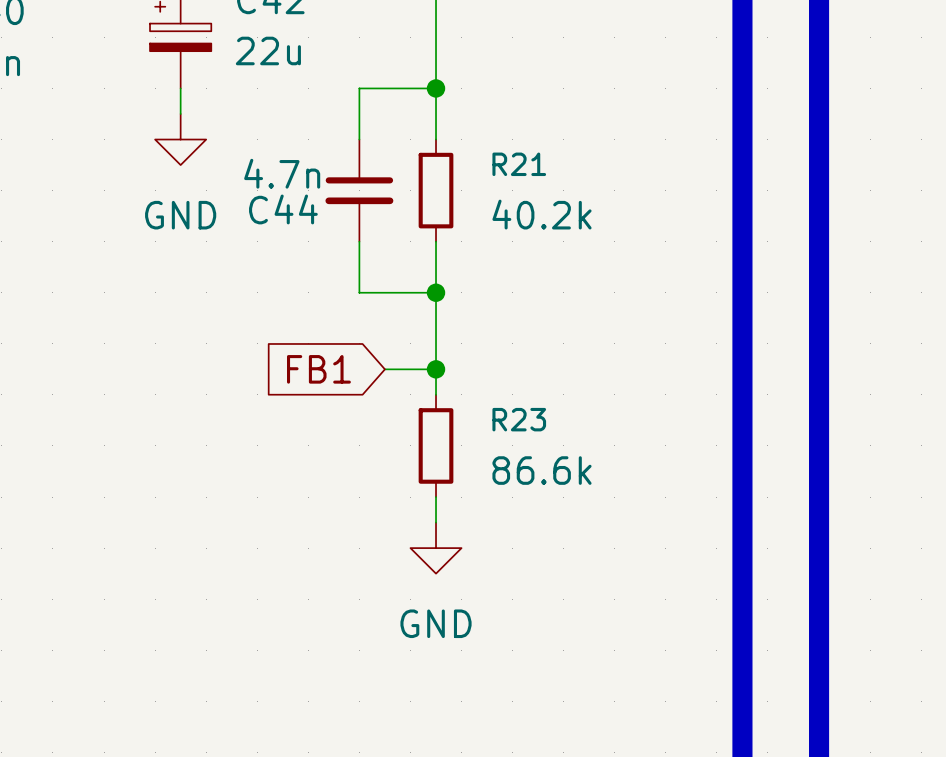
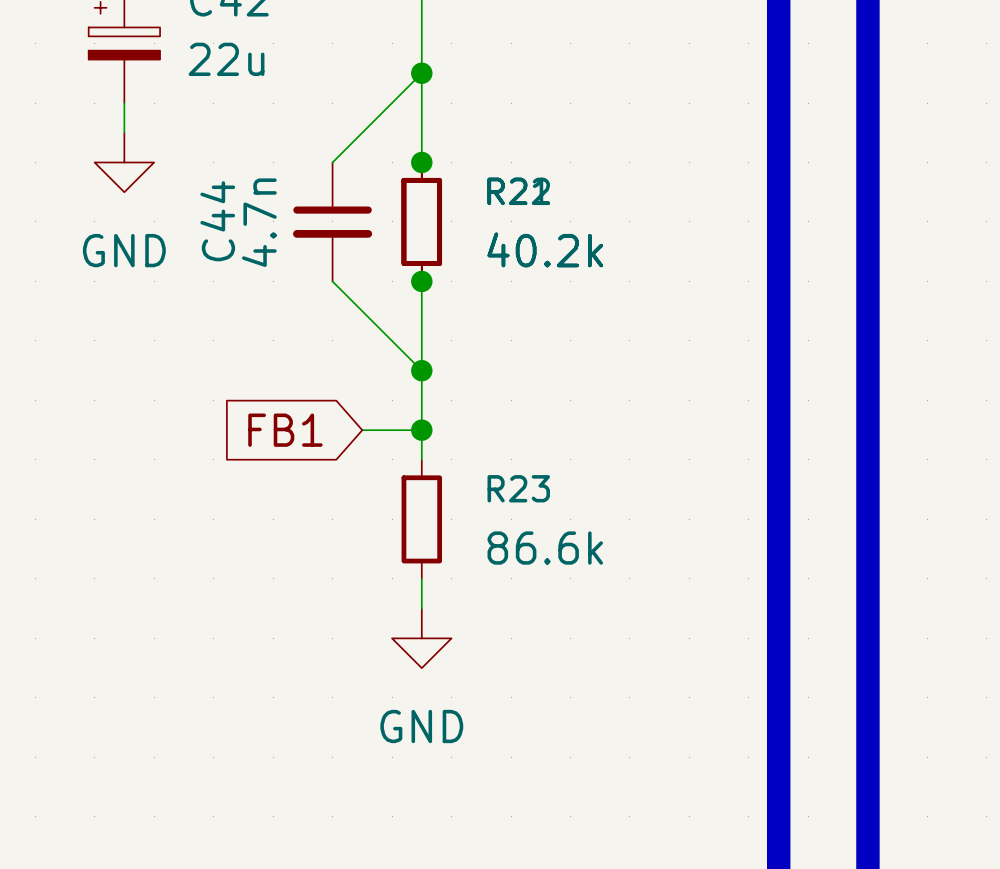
junction: none -> (421, 73)
wire: (436, 88) (359, 88) (359, 139) -> (421, 73) (332, 162)
junction: (436, 88) -> none
junction: none -> (421, 162)
C44 value rotation: 0° (282, 173) -> 90° counterclockwise (259, 222)
part: none -> 40.2k (421, 221)
C44 name rotation: 0° (283, 209) -> 90° counterclockwise (217, 221)
wire: (359, 241) (359, 292) (436, 292) -> (332, 281) (421, 370)
junction: none -> (421, 281)
junction: (436, 292) -> none
junction: none -> (421, 370)

